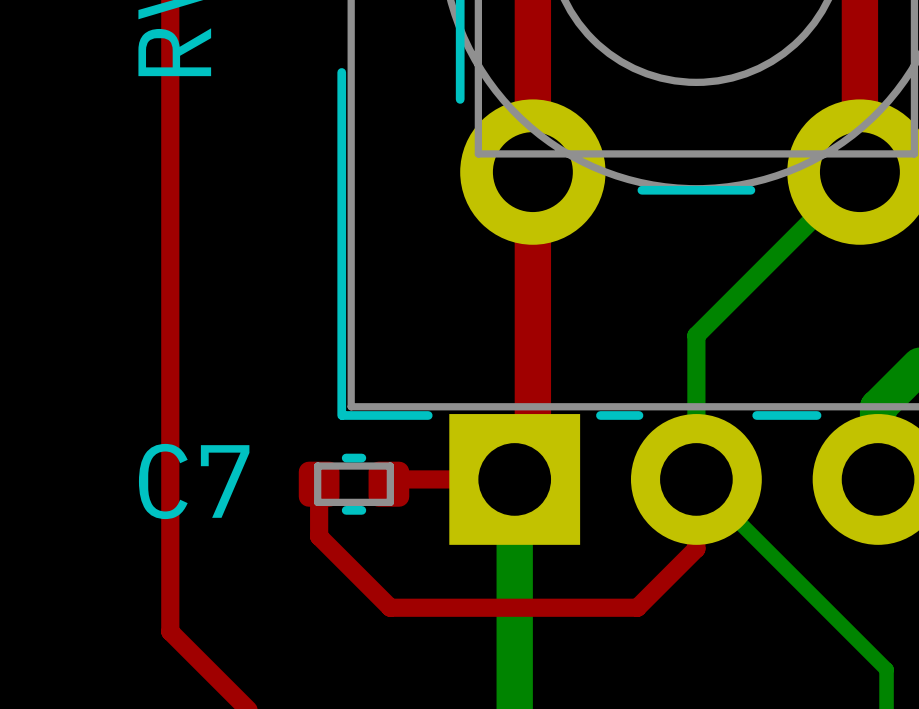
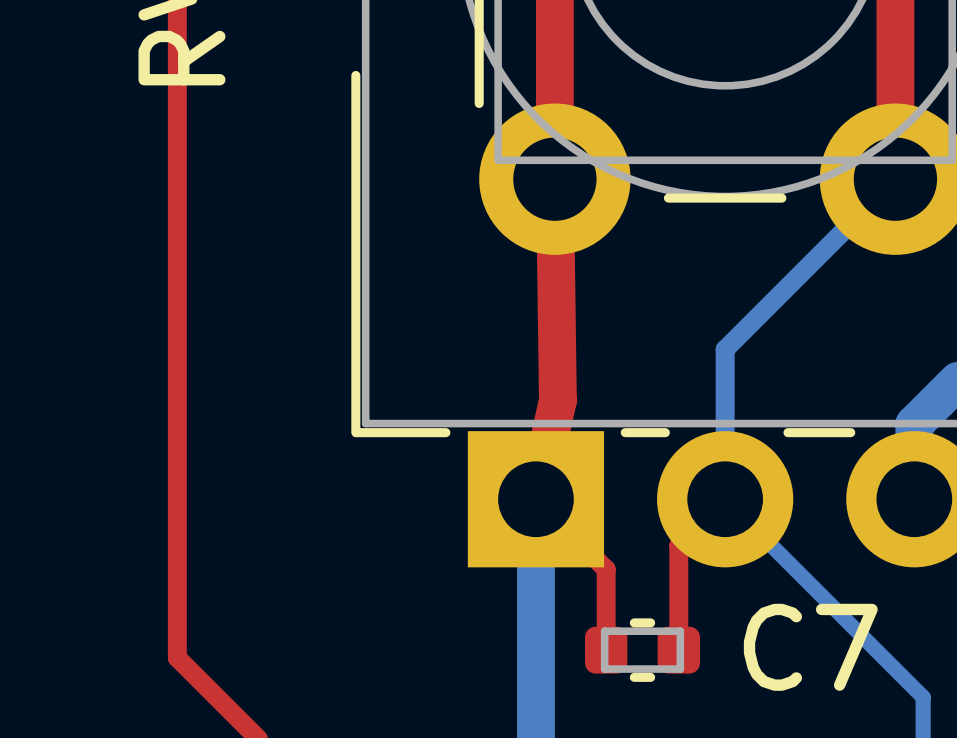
top track: (532, 172) (532, 461) (514, 479) (393, 479) (388, 484) -> (554, 179) (557, 400) (535, 499) (606, 569) (606, 650)
top track: (696, 479) (696, 548) (637, 607) (390, 607) (319, 536) (319, 484) -> (725, 499) (678, 545) (678, 650)
C7 name position: C7 (194, 481) -> C7 (810, 647)
C7 position: (354, 484) -> (642, 650)

